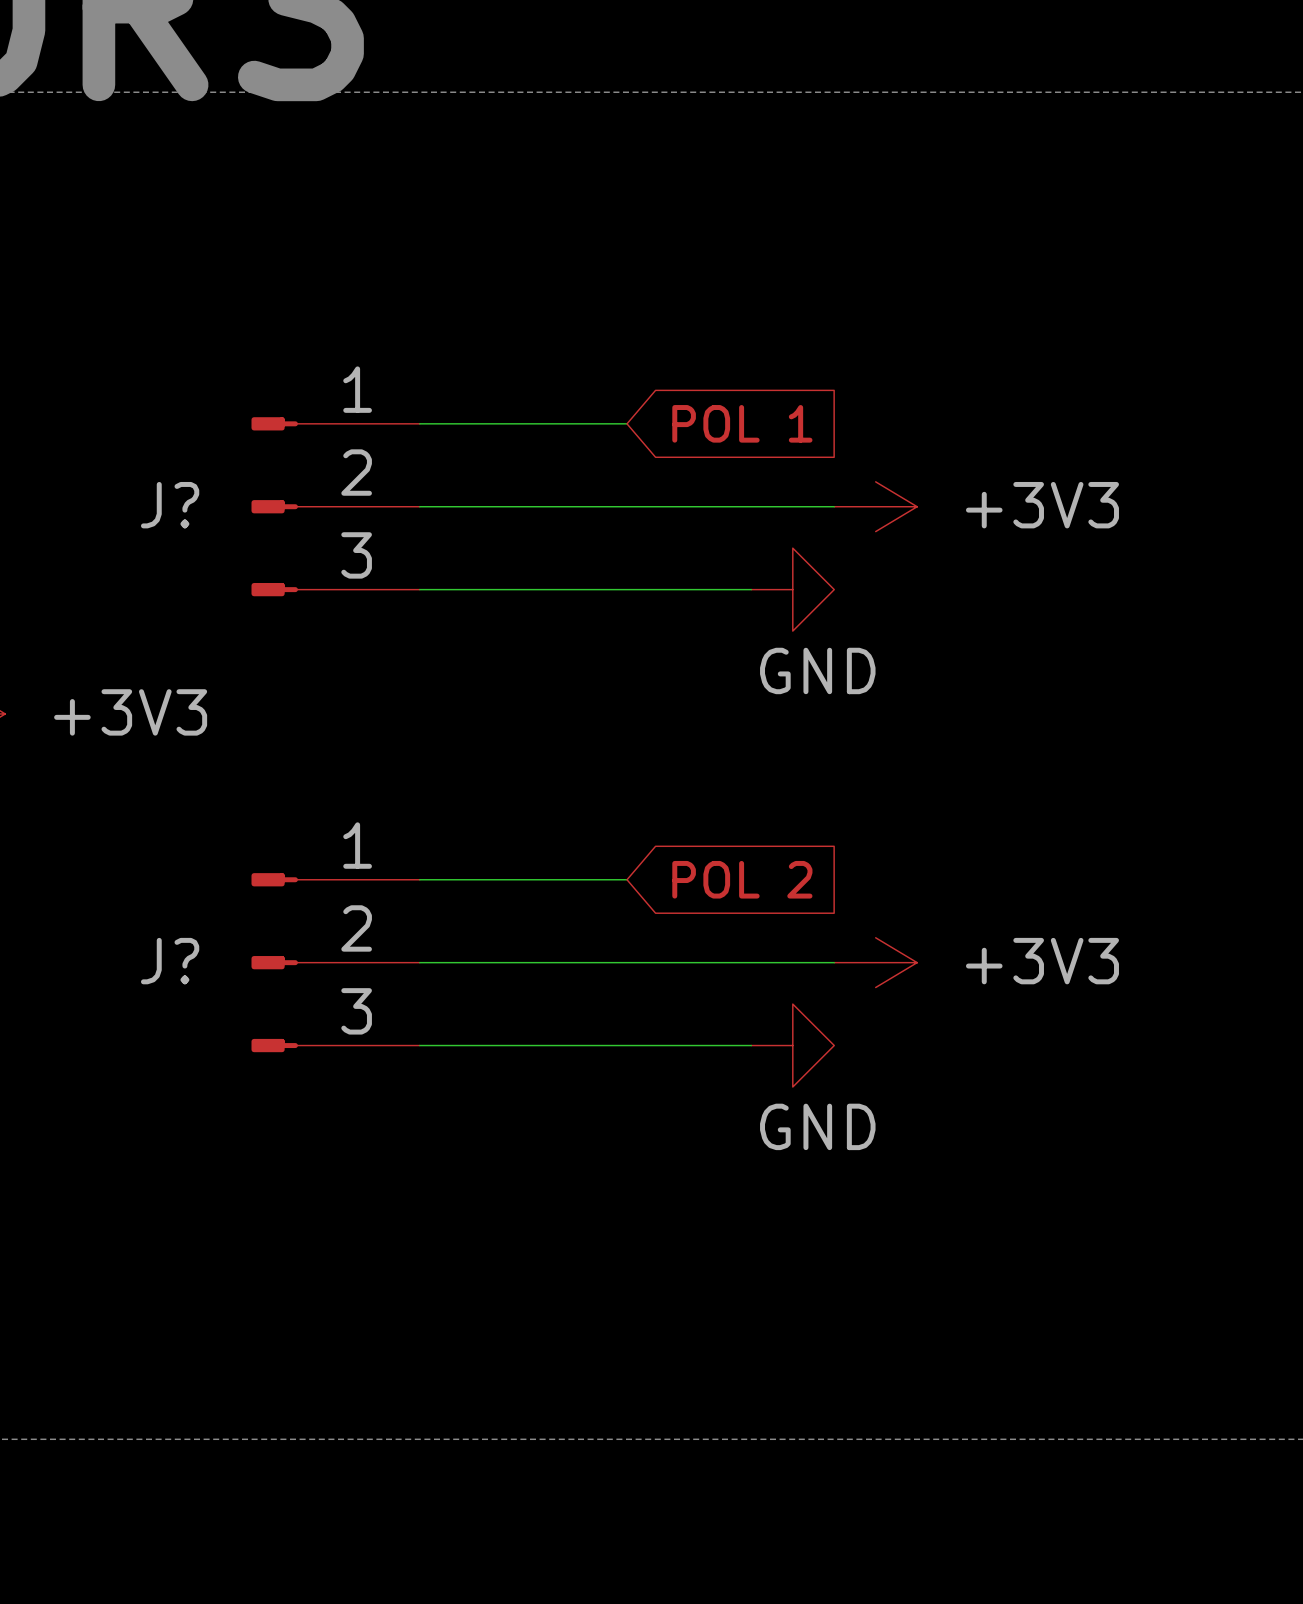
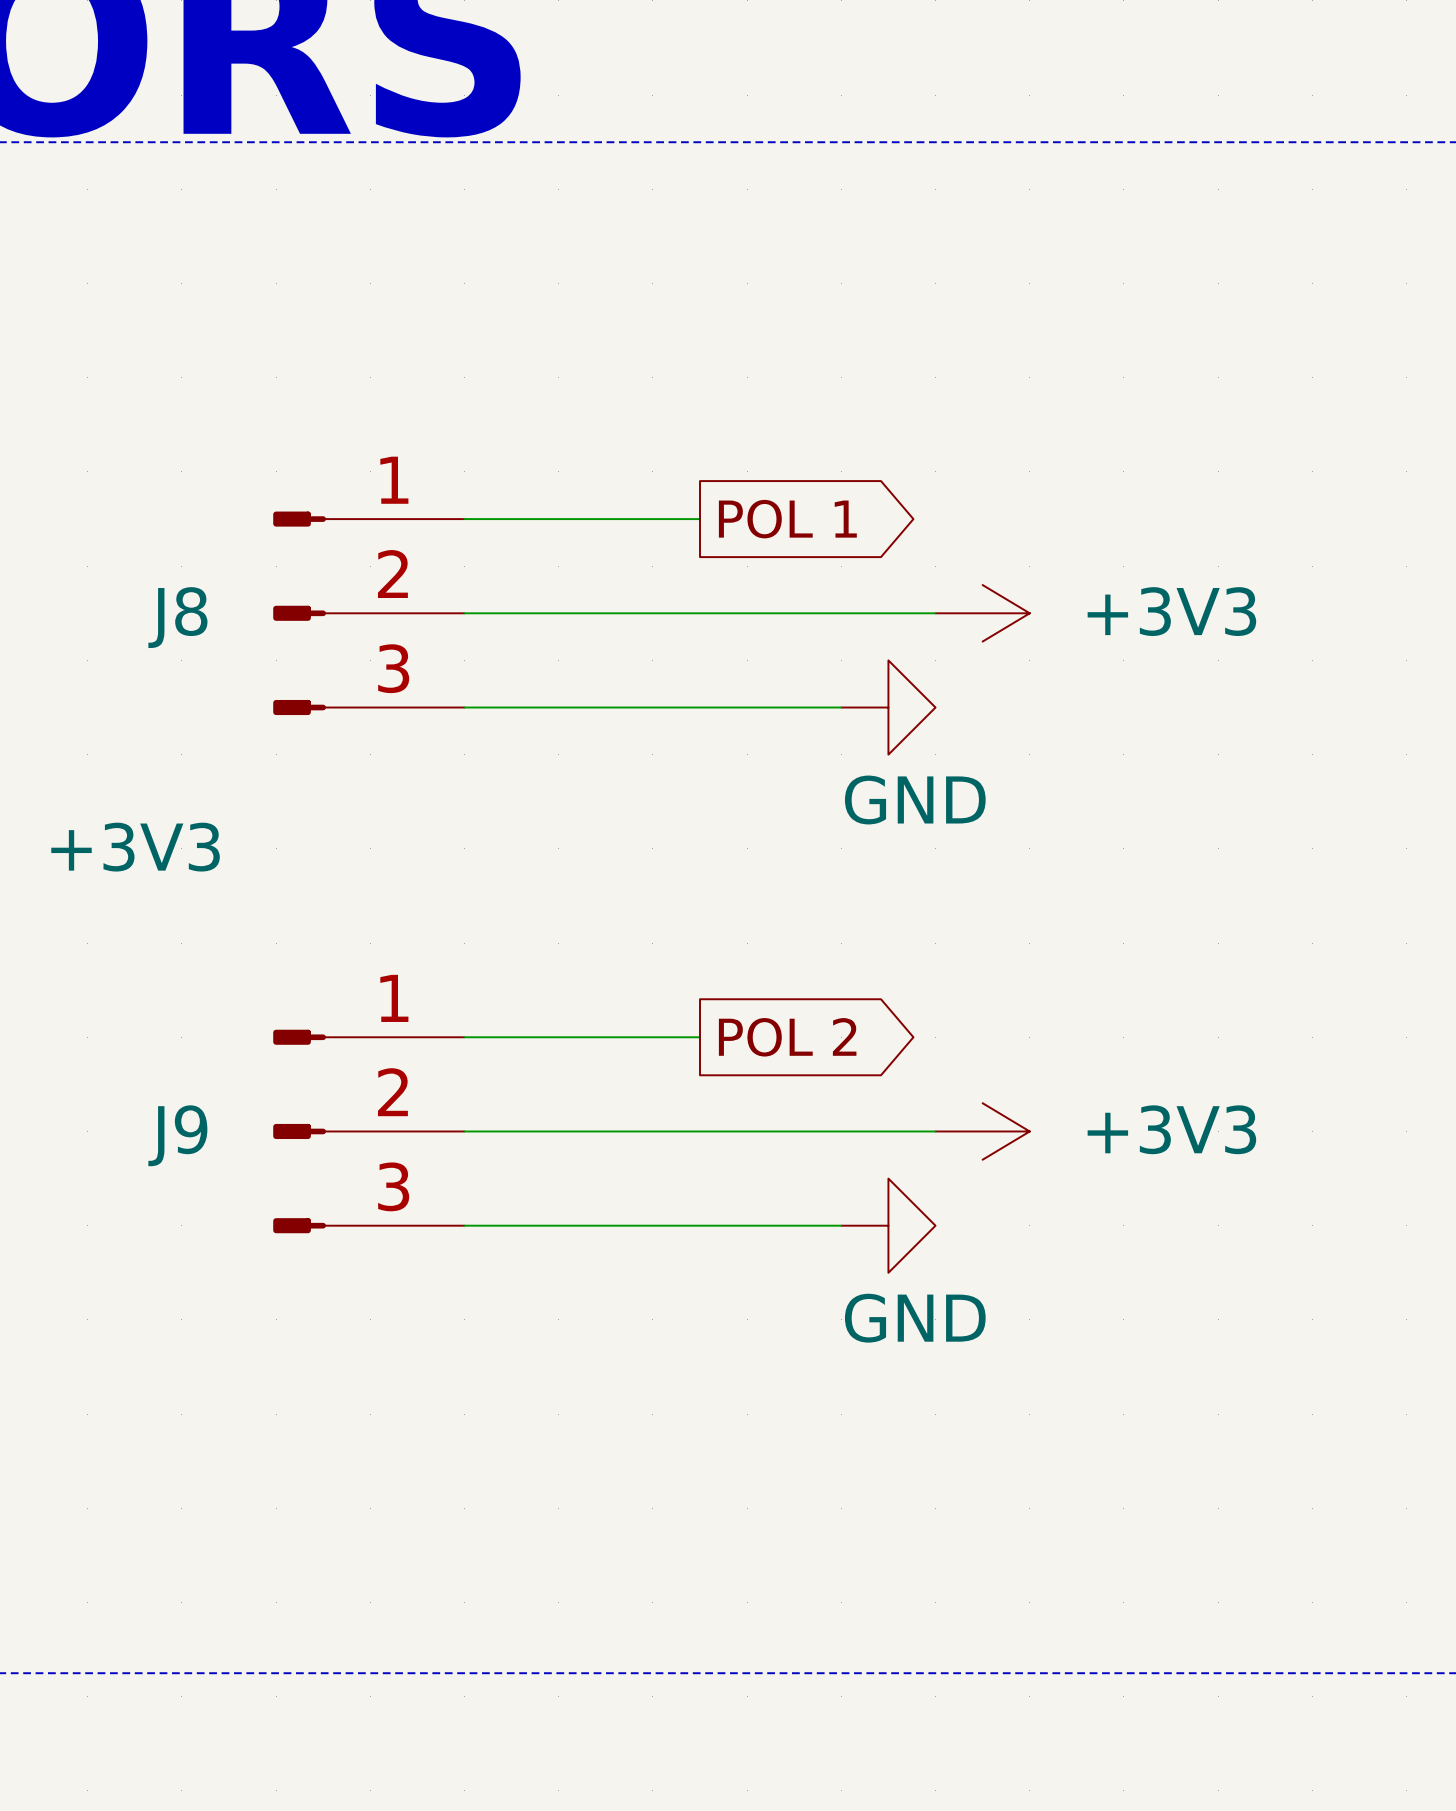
global label shape: input (742, 423) -> output (787, 519)
J? name: J? (170, 505) -> J8 (177, 617)
global label shape: input (742, 879) -> output (787, 1037)
J? name: J? (170, 961) -> J9 (177, 1135)

